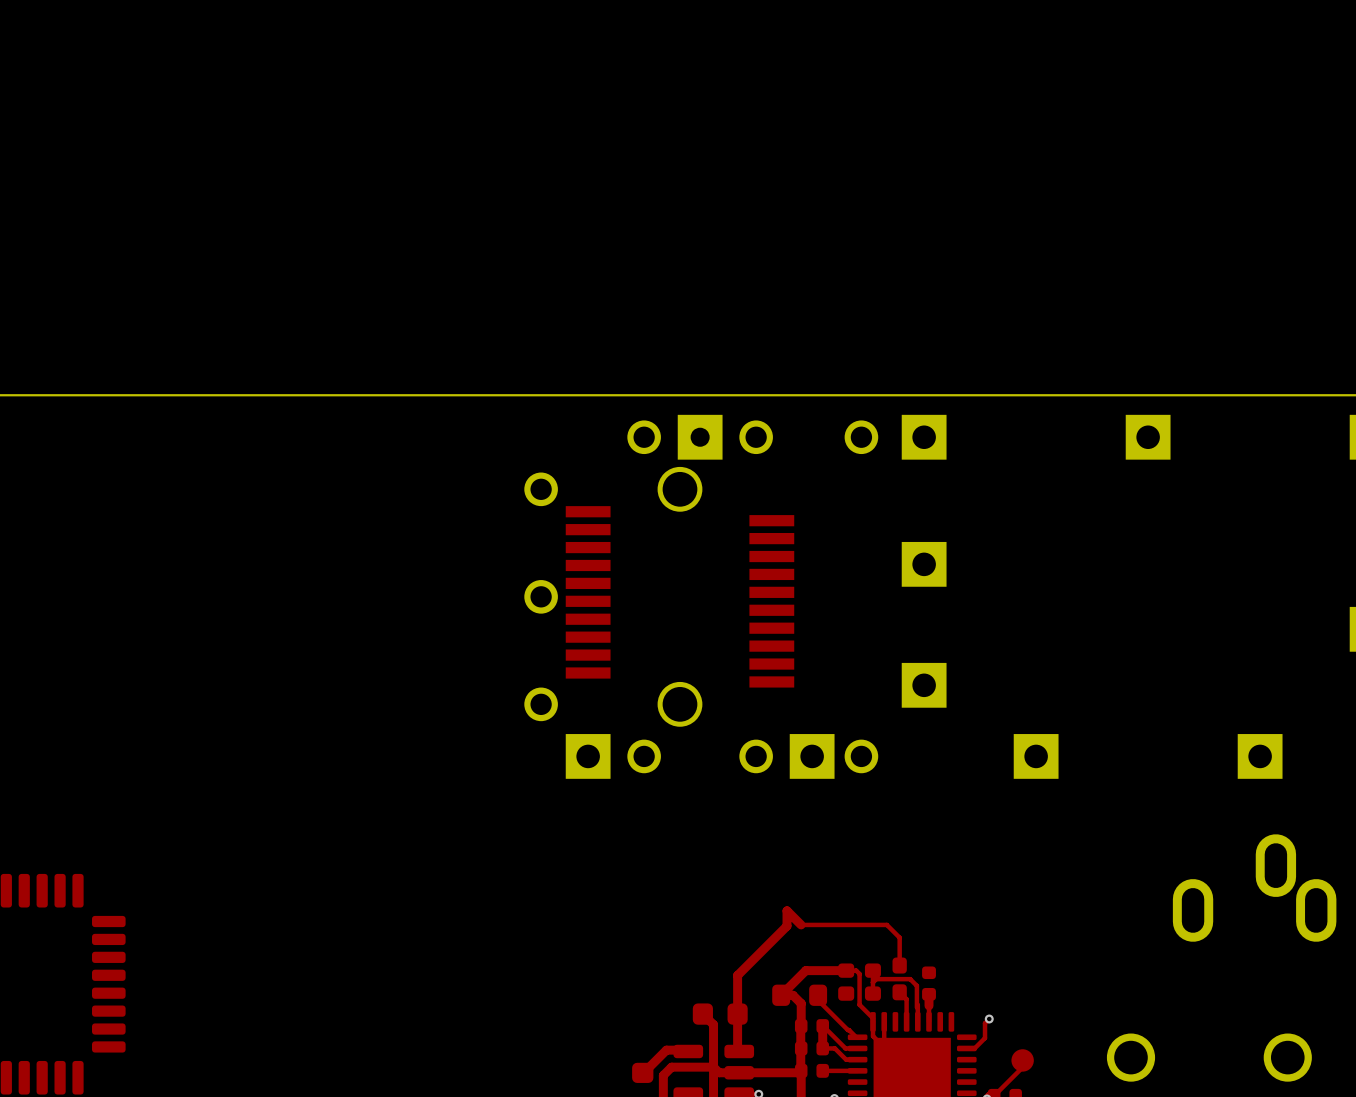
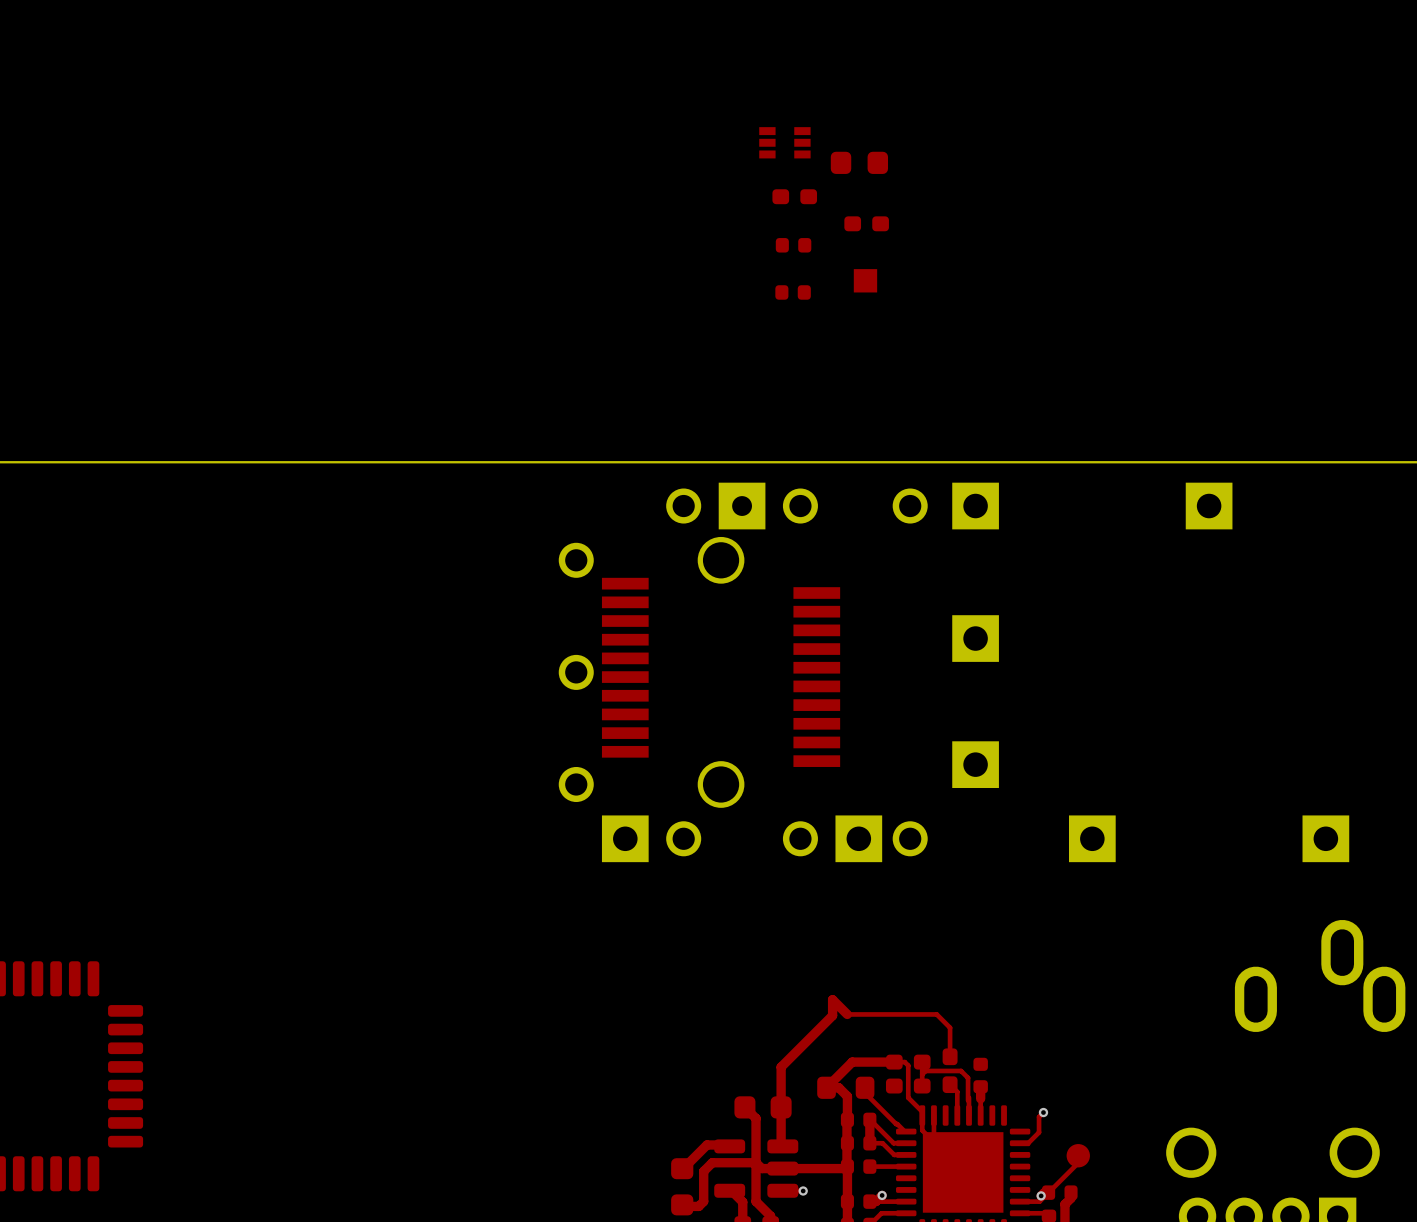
part: none -> (784, 142)
part: none -> (859, 162)
part: none -> (794, 196)
part: none -> (866, 223)
part: none -> (793, 245)
part: none -> (865, 280)
part: none -> (793, 292)

